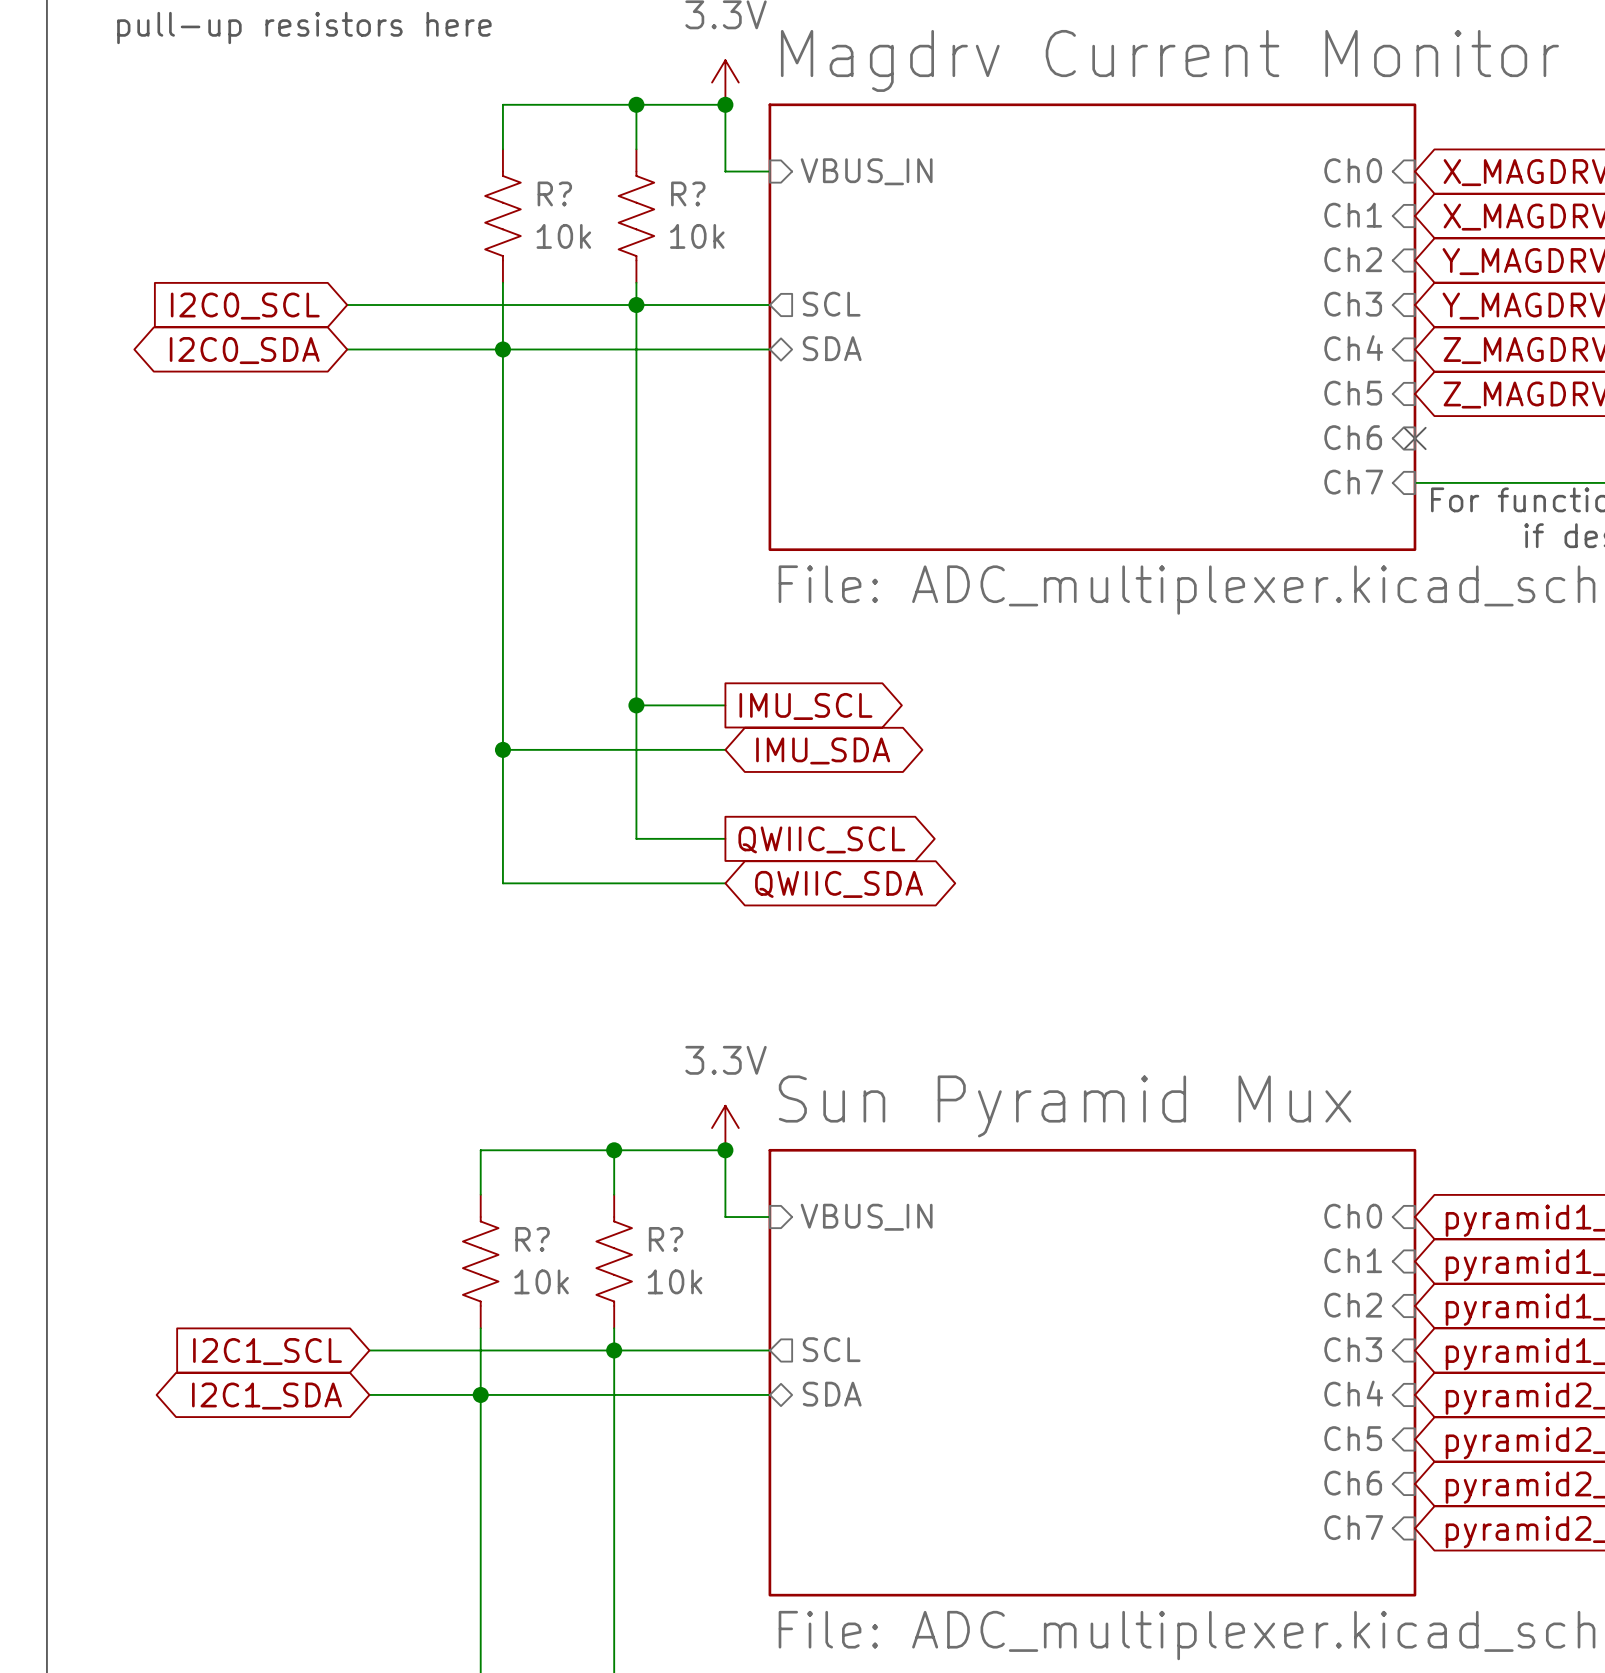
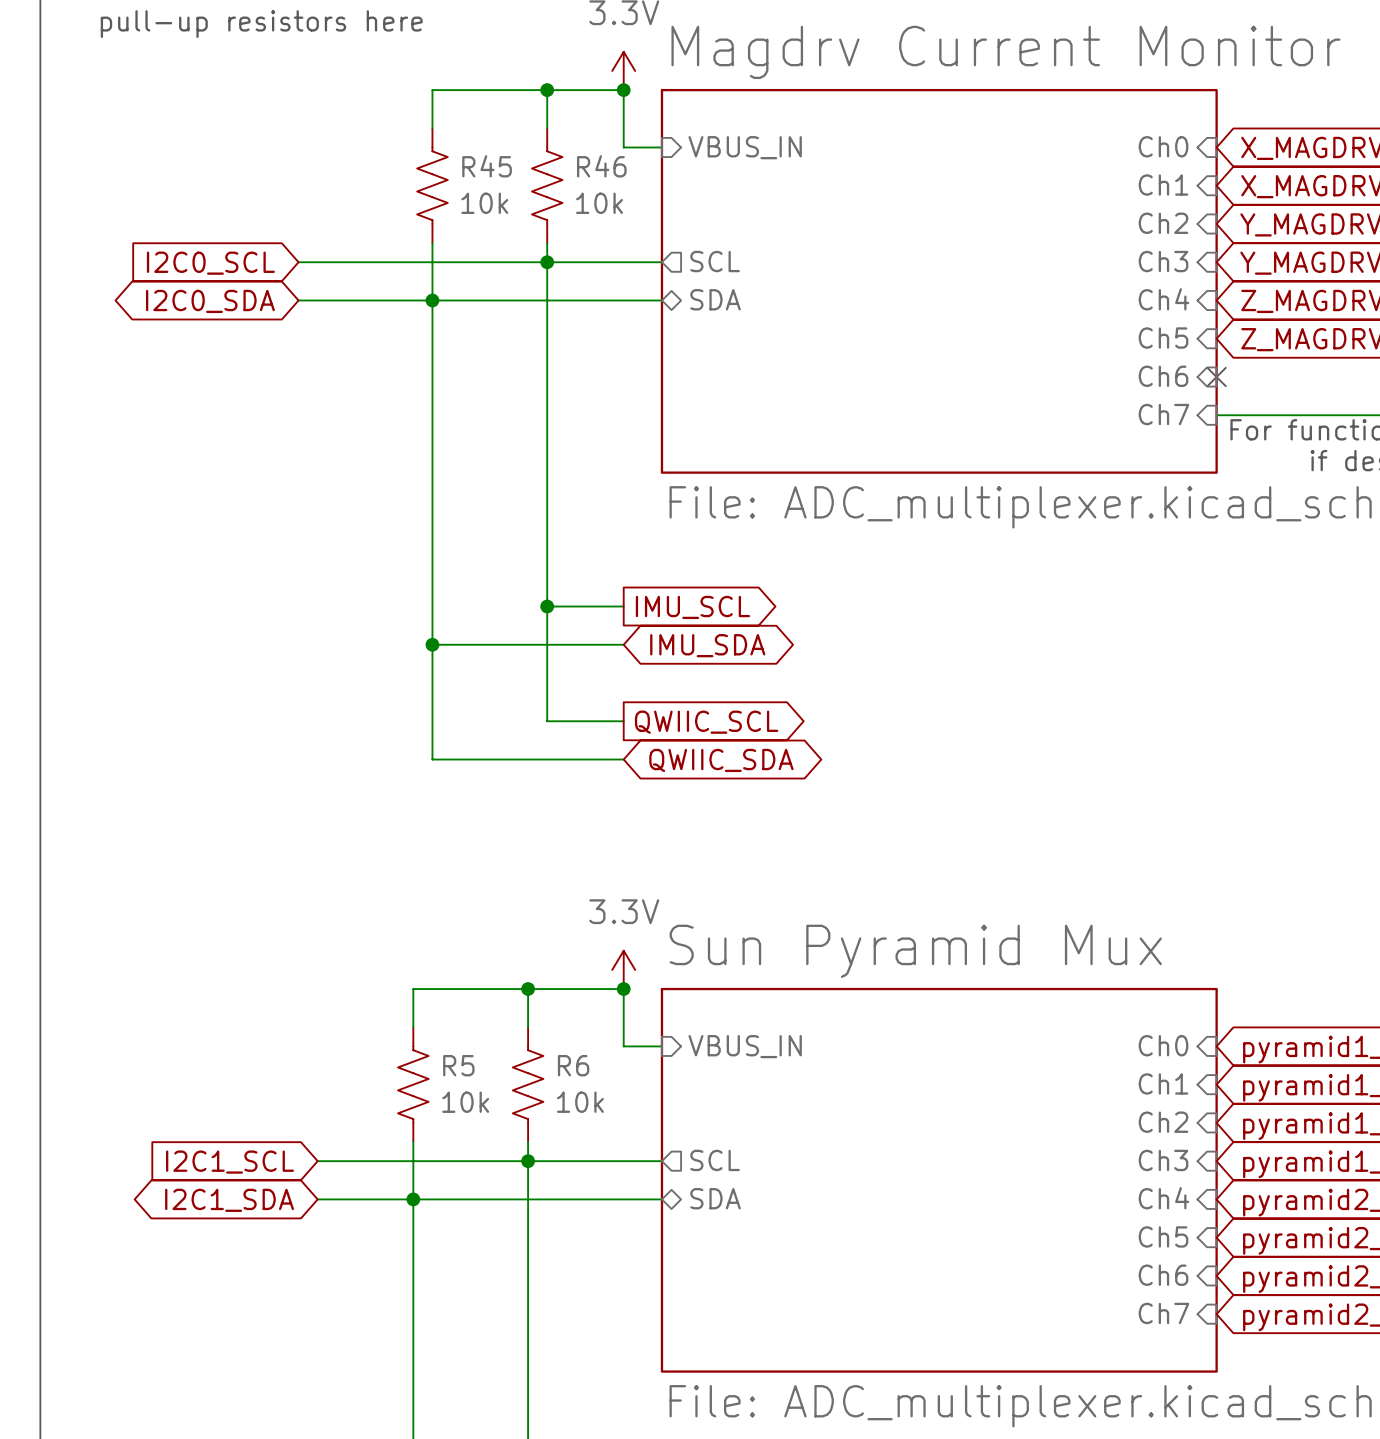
R? name: R? (554, 193) -> R45 (487, 166)
R? name: R? (688, 193) -> R46 (601, 166)
R? name: R? (532, 1239) -> R5 (458, 1065)
R? name: R? (666, 1239) -> R6 (573, 1065)

